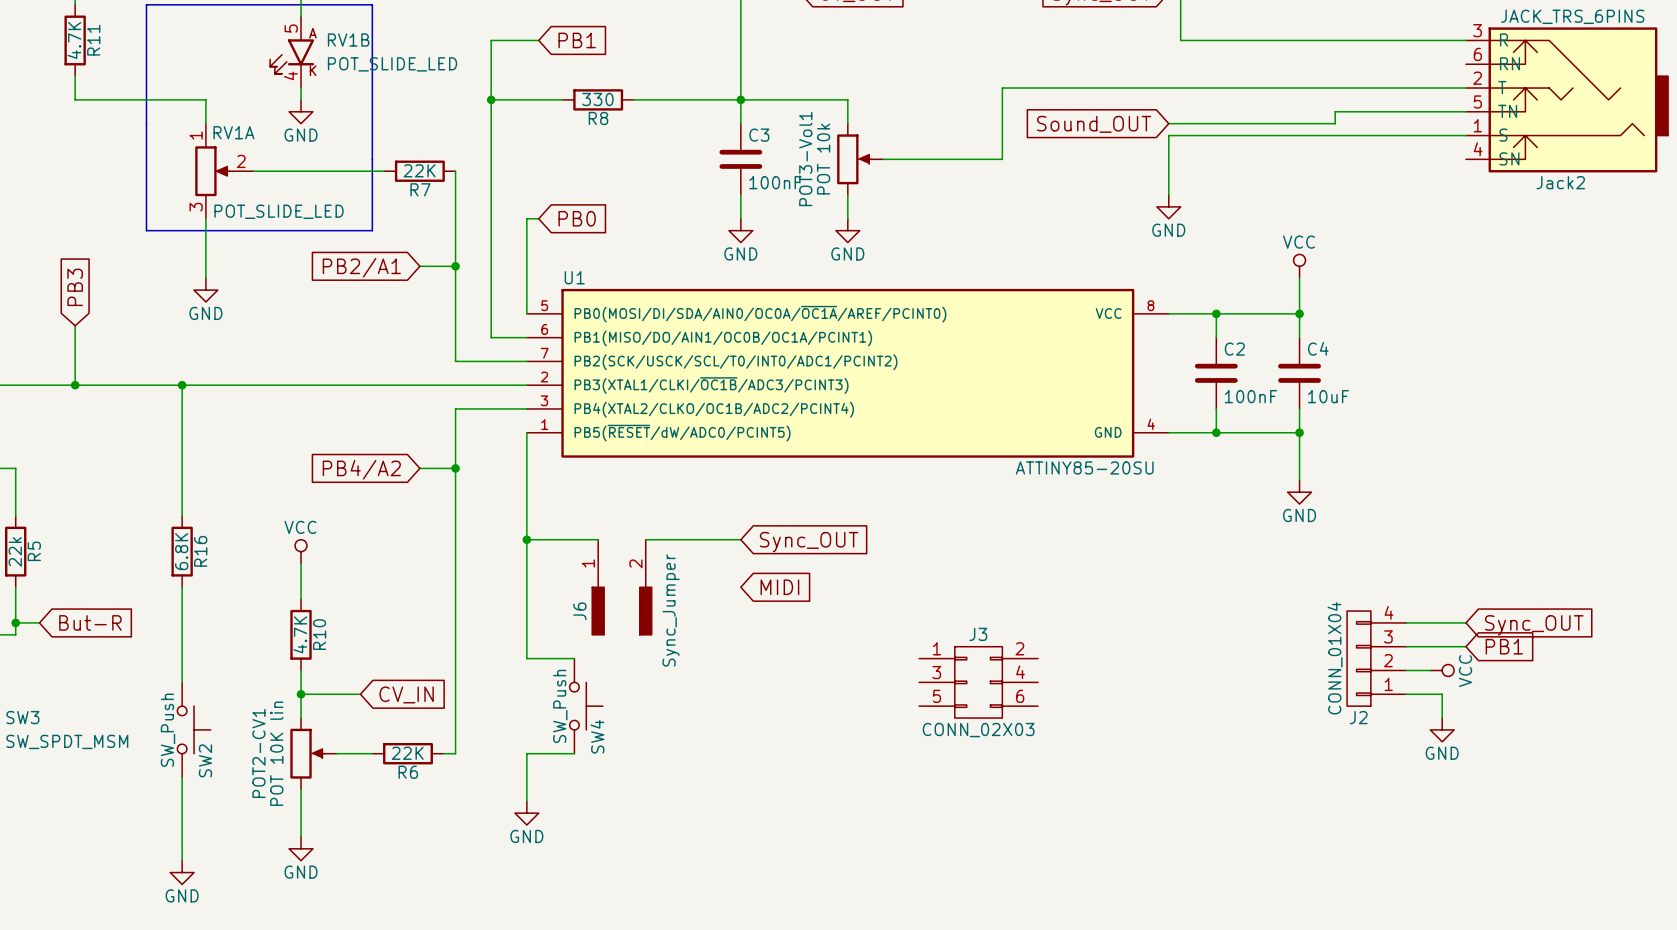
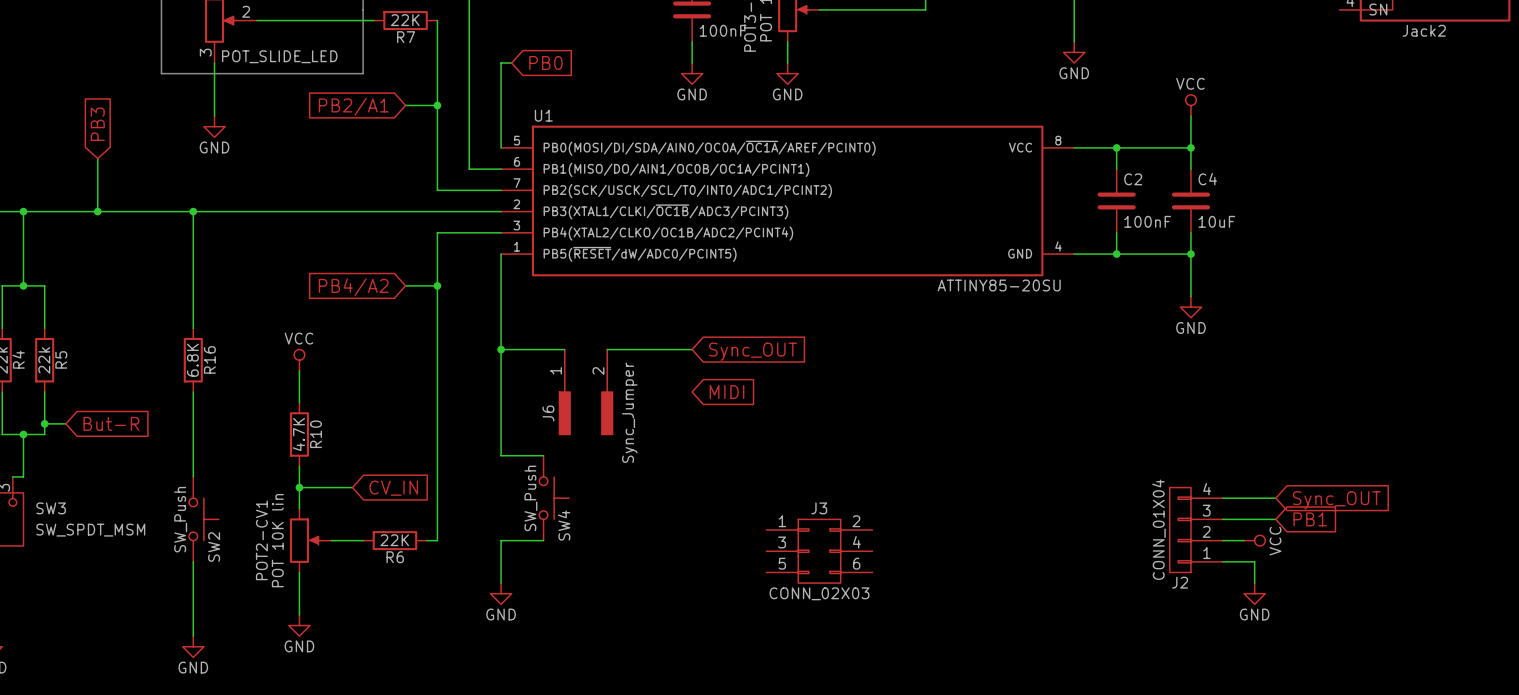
wire: (1406, 622) (1465, 622) -> (1222, 498) (1275, 498)
global label position: Sync_OUT (1534, 625) -> Sync_OUT (1336, 500)
wire: (1406, 646) (1465, 646) -> (1222, 519) (1275, 519)
global label position: PB1 (1504, 646) -> PB1 (1310, 519)
J2 position: (1376, 658) -> (1196, 530)
wire: (1406, 670) (1430, 670) -> (1222, 540) (1244, 540)
power symbol position: VCC (1442, 670) -> VCC (1254, 540)
J3 position: (978, 682) -> (819, 551)
wire: (1406, 694) (1442, 694) (1442, 718) -> (1222, 561) (1254, 561) (1254, 583)
power symbol position: GND (1442, 729) -> GND (1254, 593)

